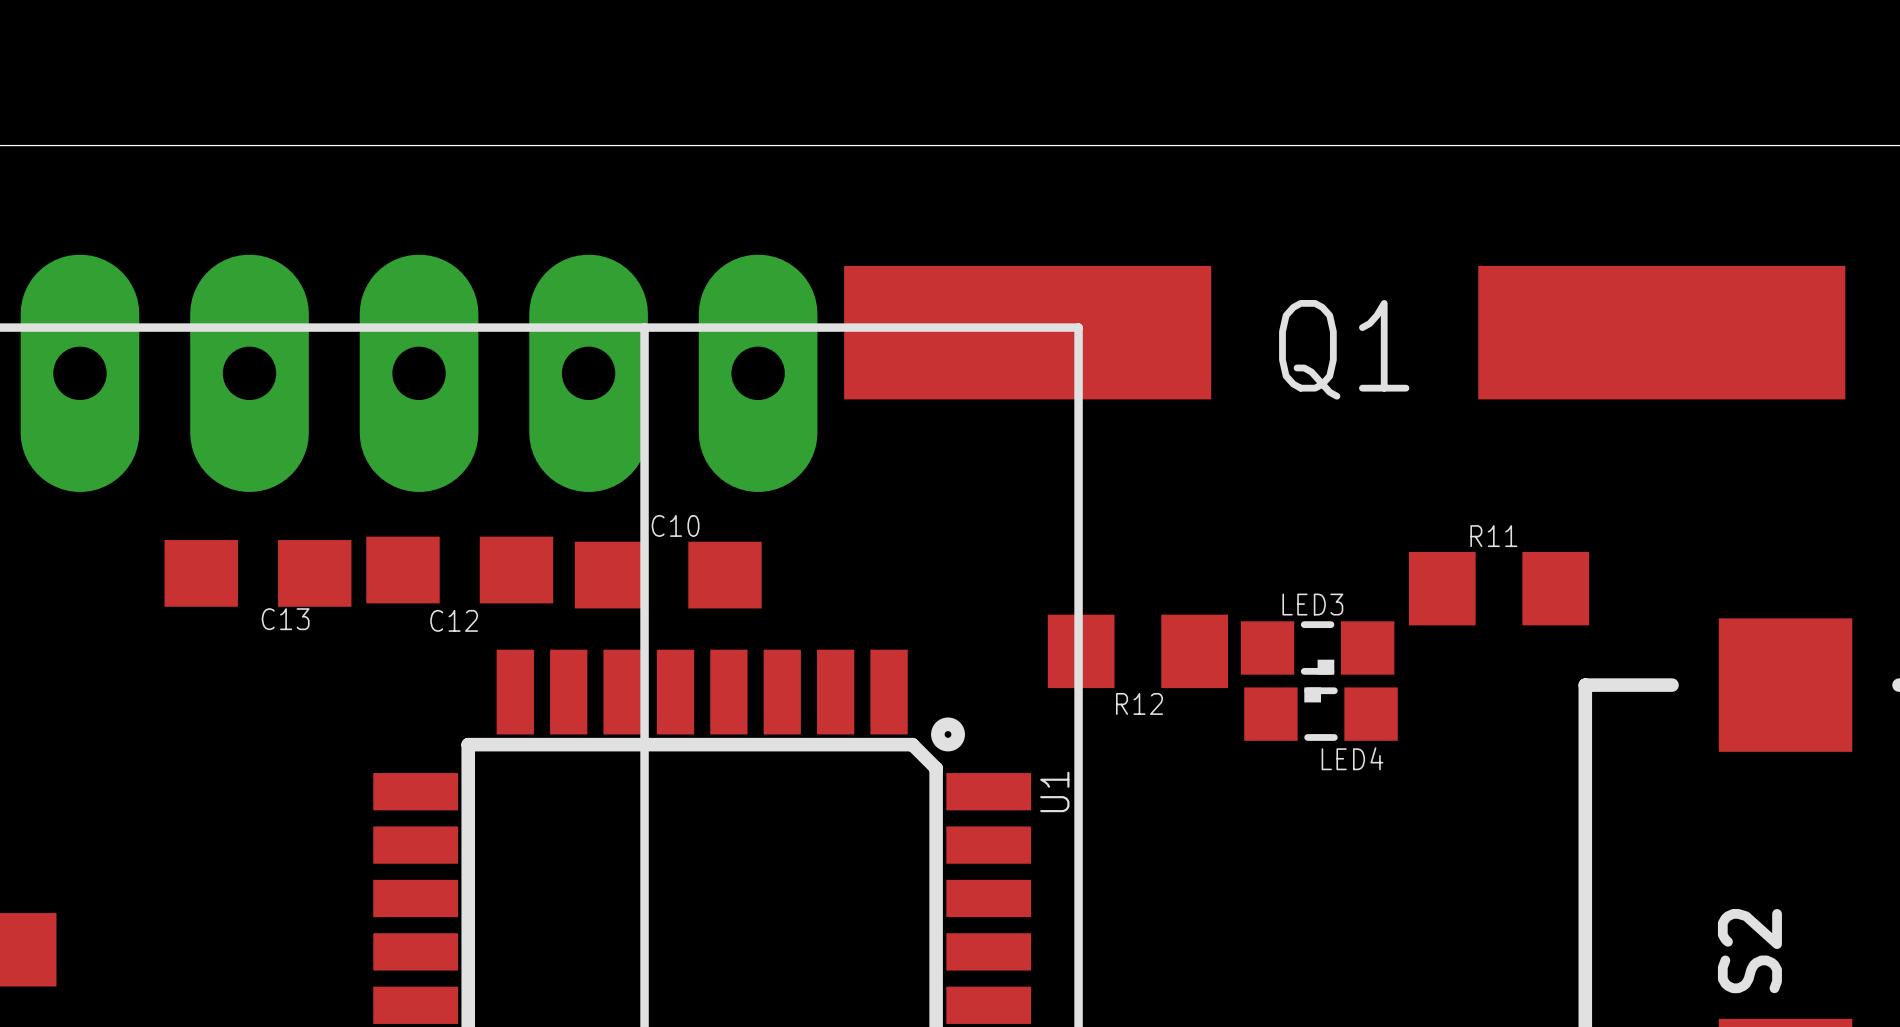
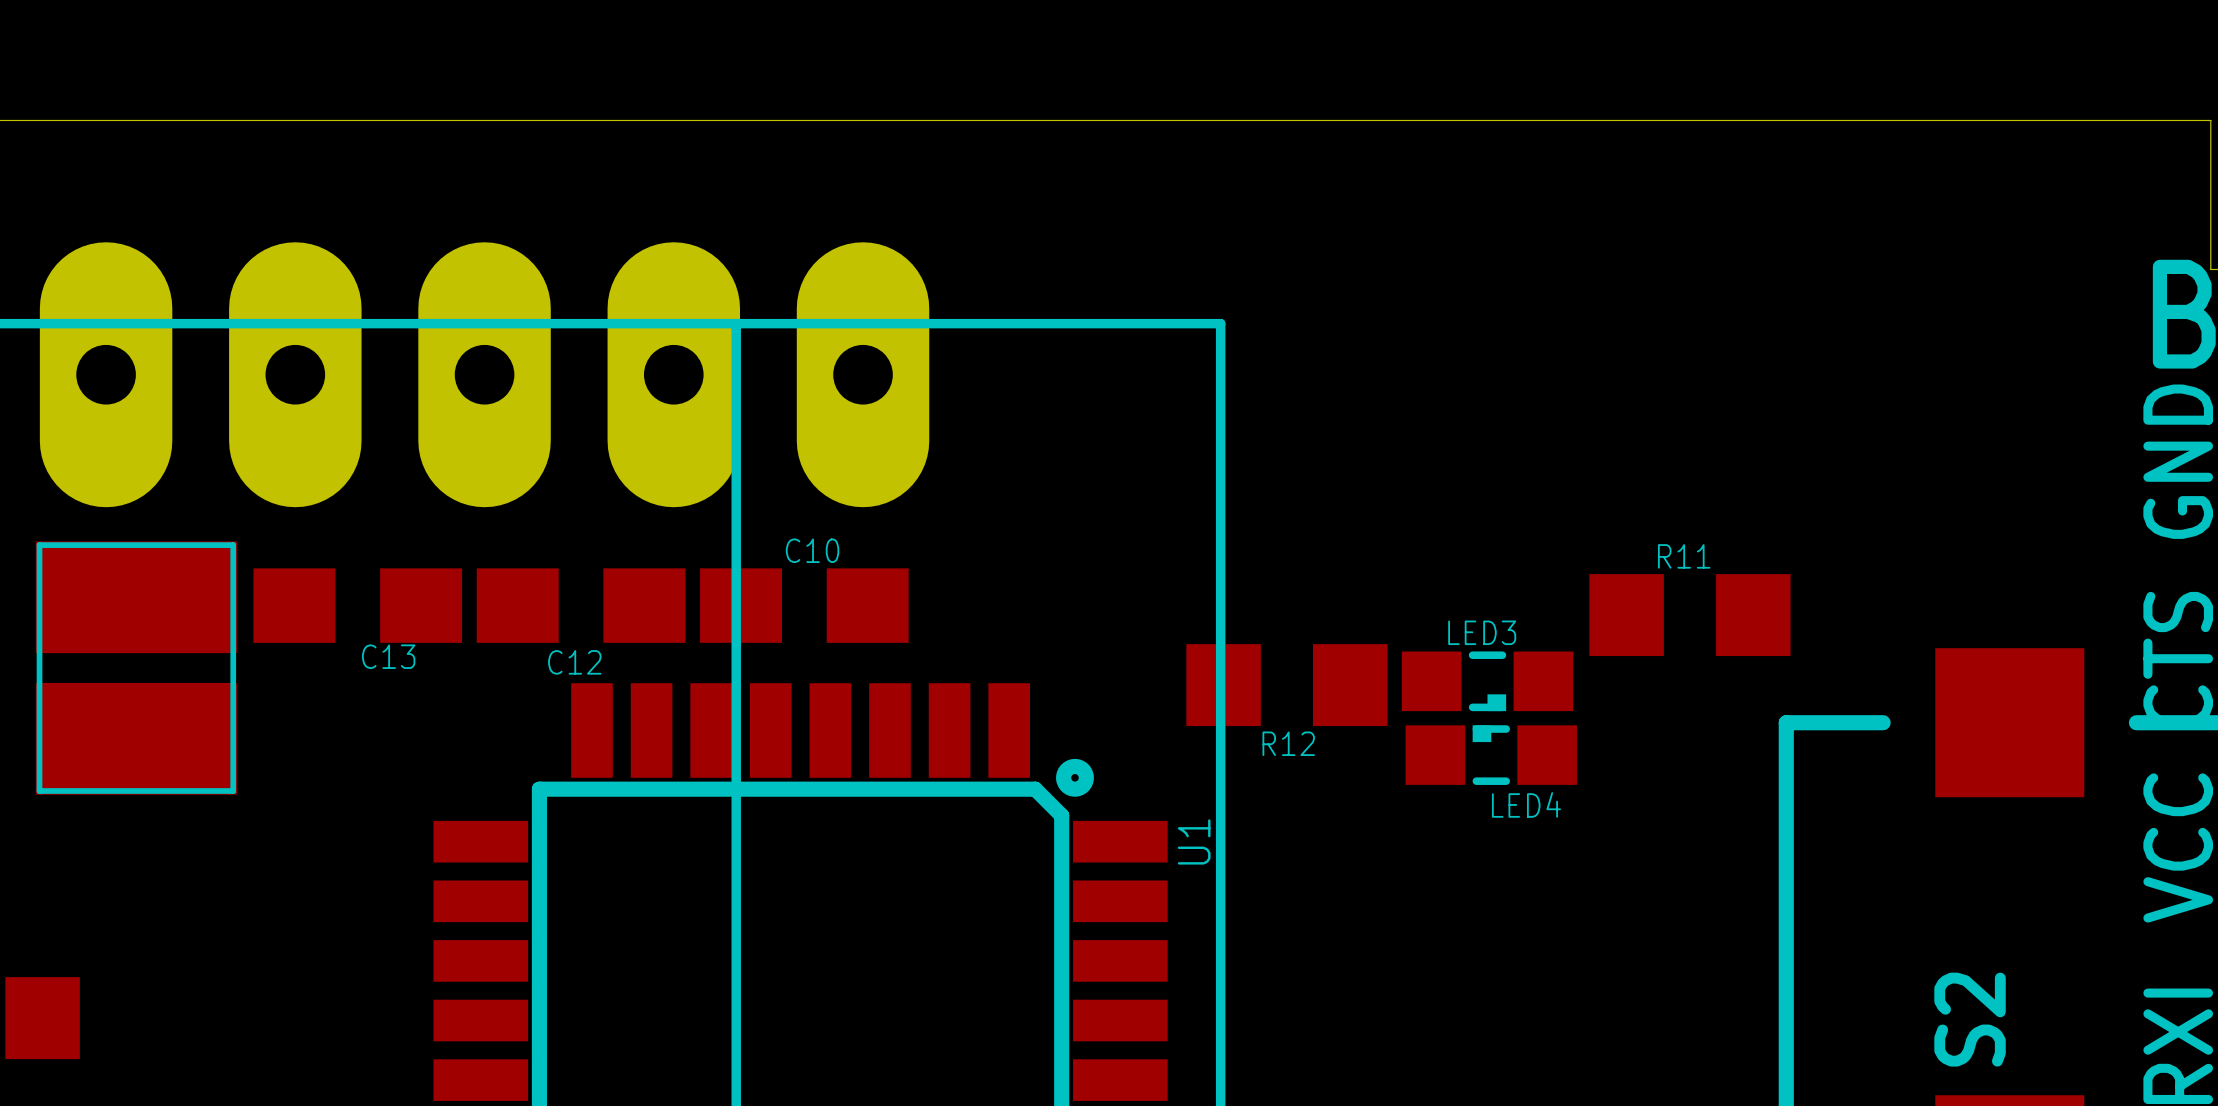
Q1: (1344, 332) -> none
C12 position: (459, 570) -> (581, 605)
C13 position: (257, 573) -> (357, 605)
C10 position: (668, 575) -> (804, 605)
part: none -> (136, 668)

